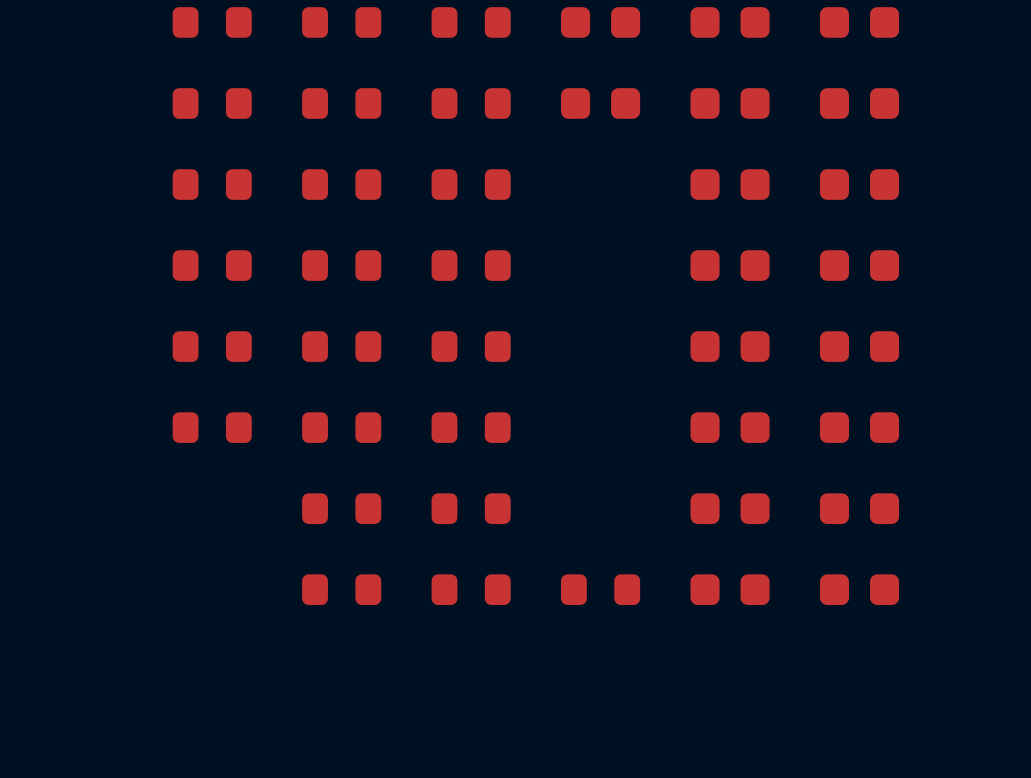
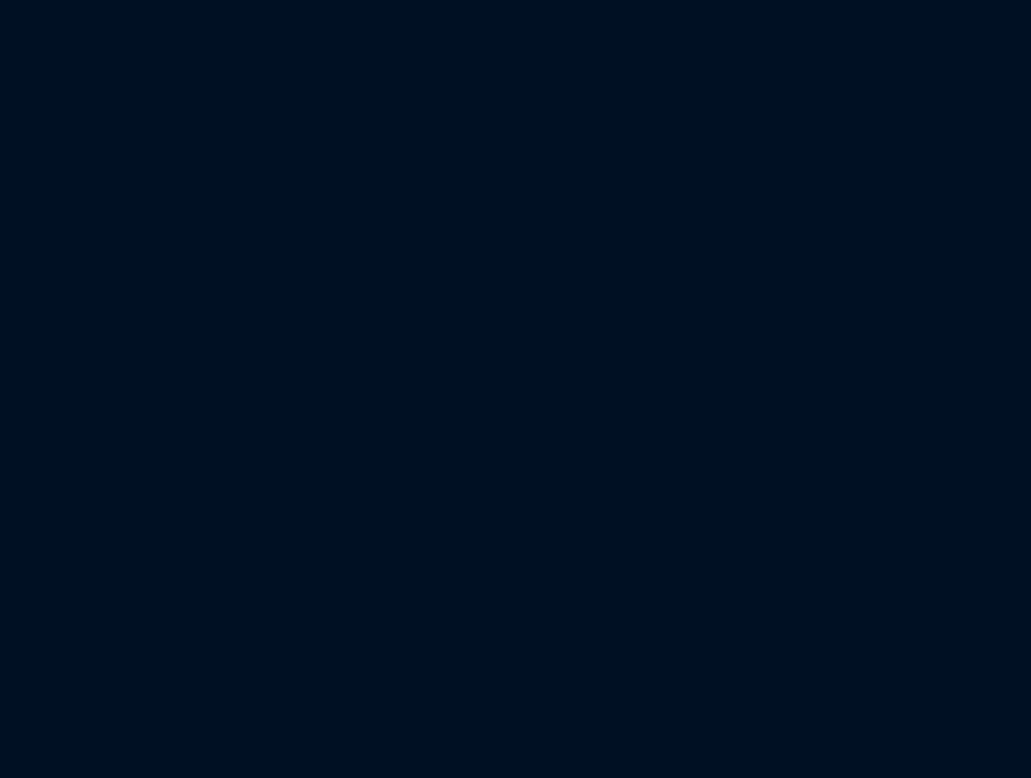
part: (212, 22) -> none
part: (341, 22) -> none
part: (471, 22) -> none
part: (600, 22) -> none
part: (730, 22) -> none
part: (859, 22) -> none
part: (212, 103) -> none
part: (341, 103) -> none
part: (471, 103) -> none
part: (600, 103) -> none
part: (730, 103) -> none
part: (859, 103) -> none
part: (212, 184) -> none
part: (341, 184) -> none
part: (471, 184) -> none
part: (730, 184) -> none
part: (859, 184) -> none
part: (212, 265) -> none
part: (341, 265) -> none
part: (471, 265) -> none
part: (730, 265) -> none
part: (859, 265) -> none
part: (212, 346) -> none
part: (341, 346) -> none
part: (471, 346) -> none
part: (730, 346) -> none
part: (859, 346) -> none
part: (212, 427) -> none
part: (341, 427) -> none
part: (471, 427) -> none
part: (730, 427) -> none
part: (859, 427) -> none
part: (341, 508) -> none
part: (471, 508) -> none
part: (730, 508) -> none
part: (859, 508) -> none
part: (341, 589) -> none
part: (471, 589) -> none
part: (600, 589) -> none
part: (730, 589) -> none
part: (859, 589) -> none

